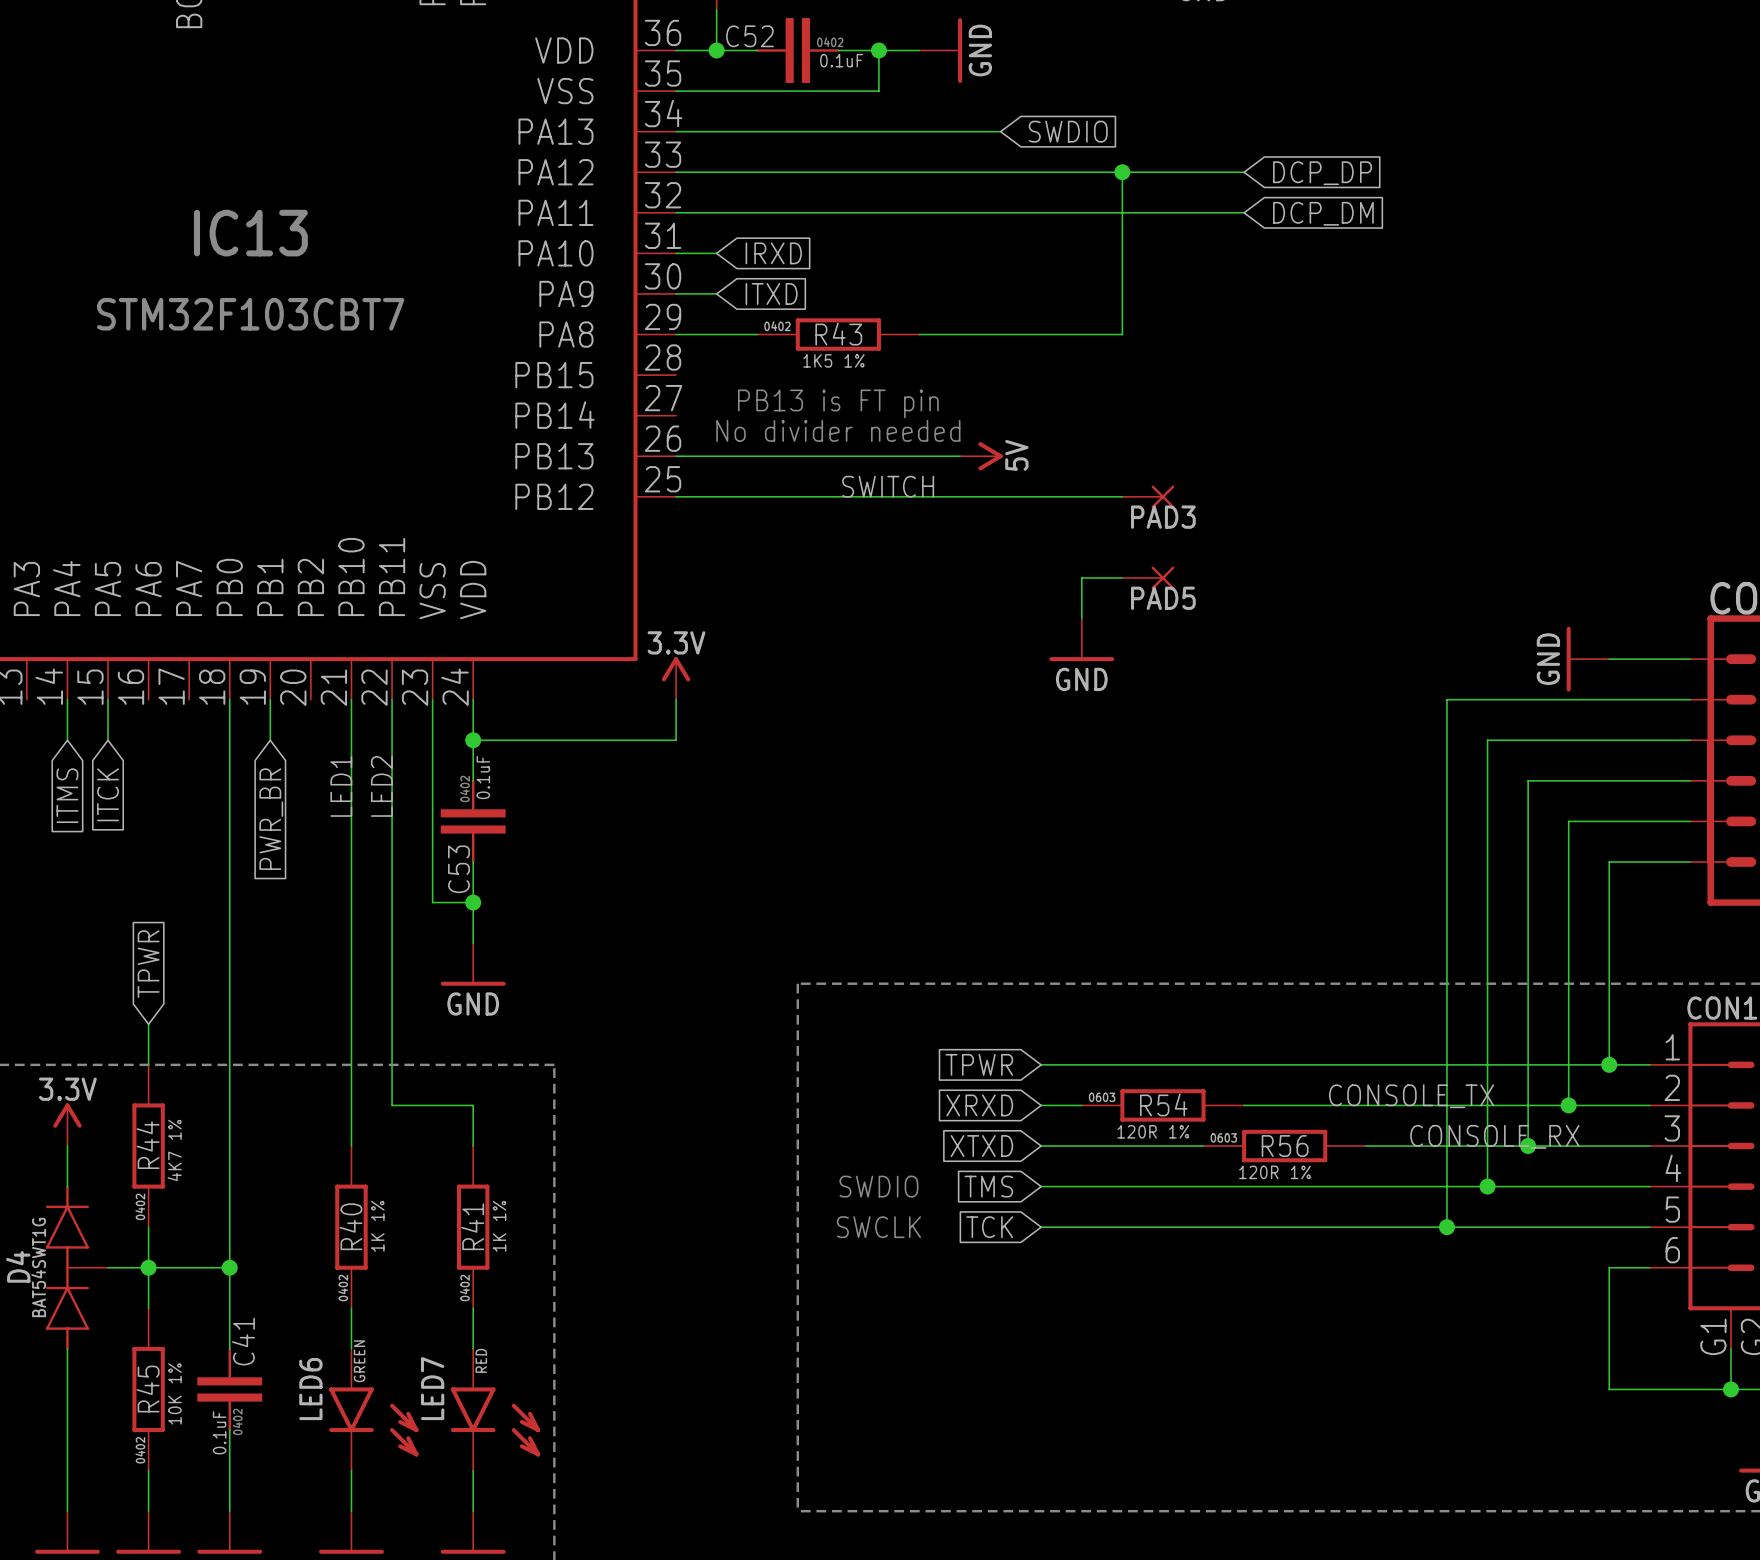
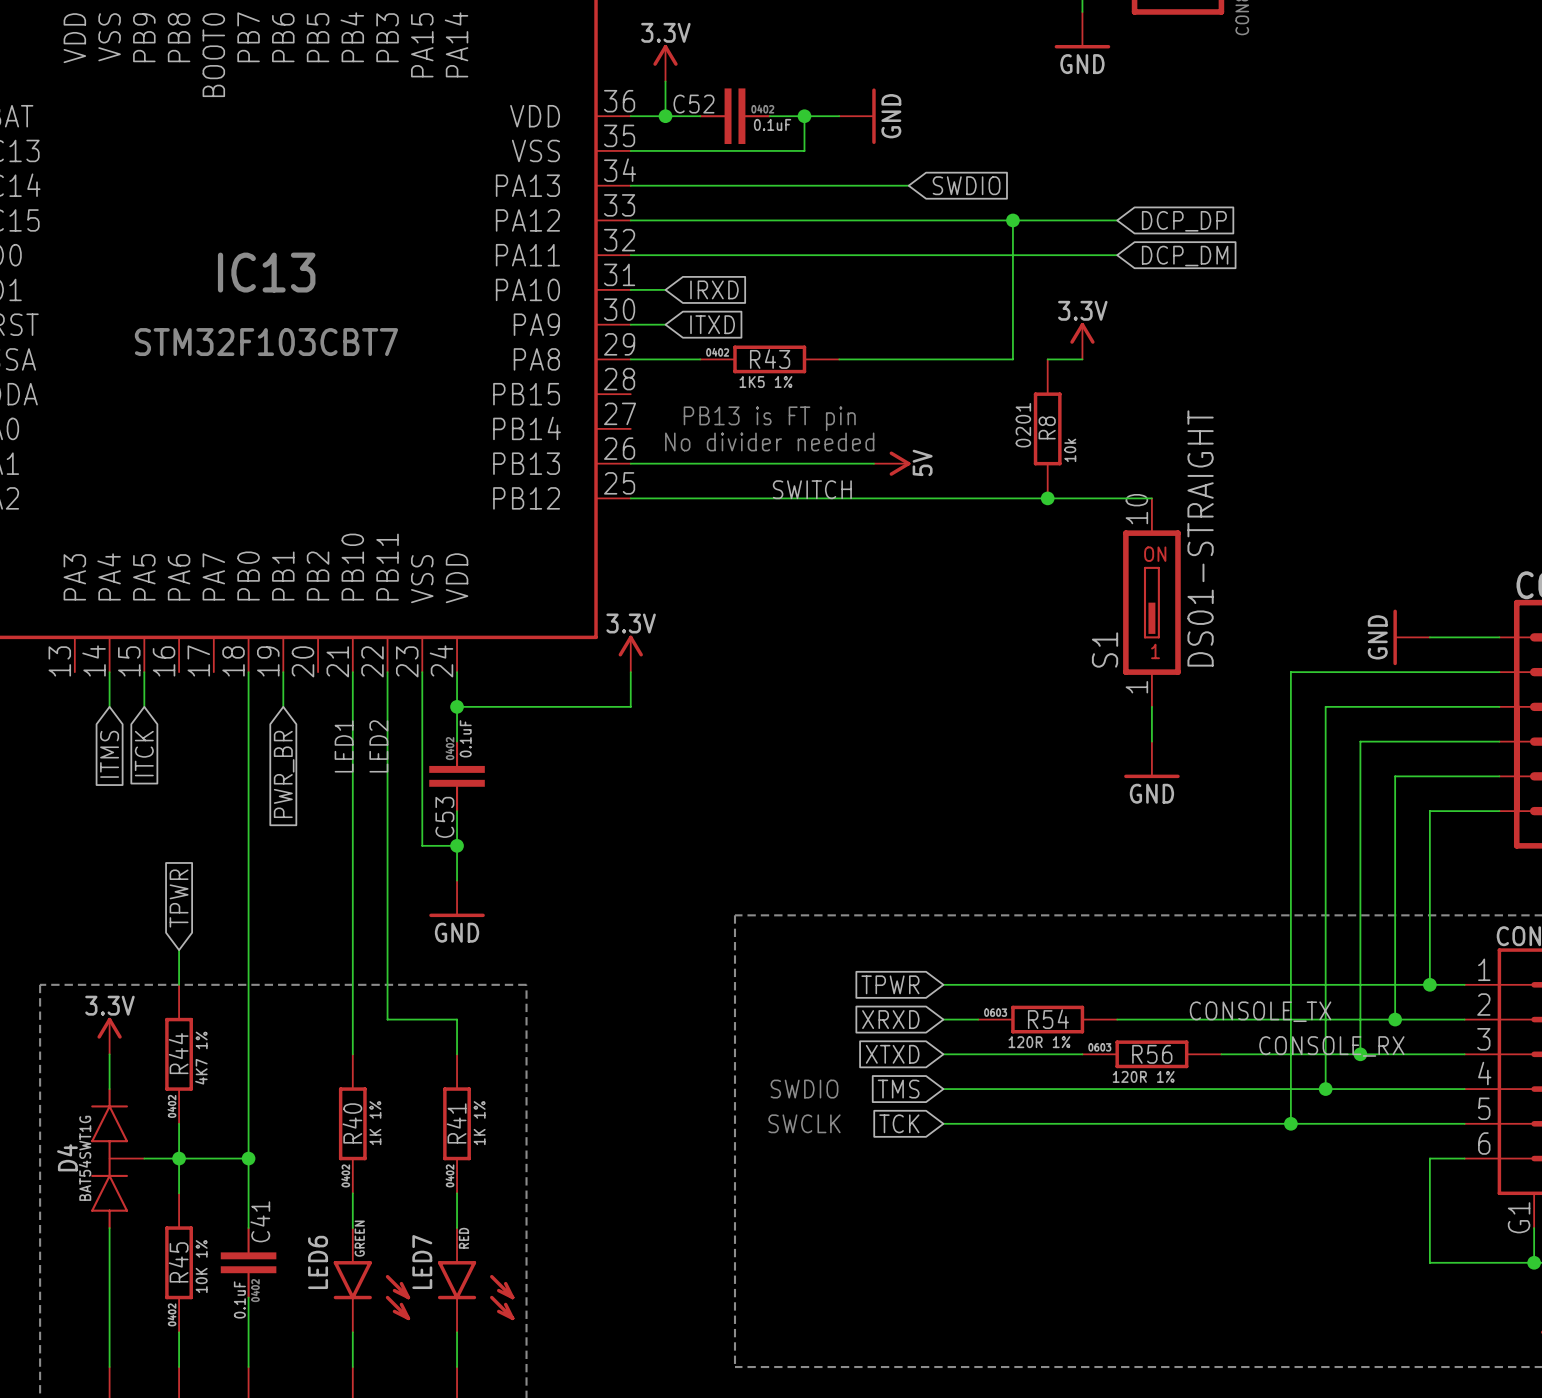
power symbol: none -> 3.3V (1082, 341)
wire: none -> (1047, 359) (1082, 359)
R8: none -> 10k (1047, 428)
wire: none -> (1012, 498) (1151, 498)
PAD3: (1148, 496) -> none
junction: none -> (1047, 498)
wire: (1122, 577) (1081, 577) (1081, 618) -> none
PAD5: (1148, 577) -> none
S1: none -> DS01-STRAIGHT (1151, 602)
power symbol position: GND (1081, 639) -> GND (1151, 759)
wire: none -> (1151, 706) (1151, 741)

